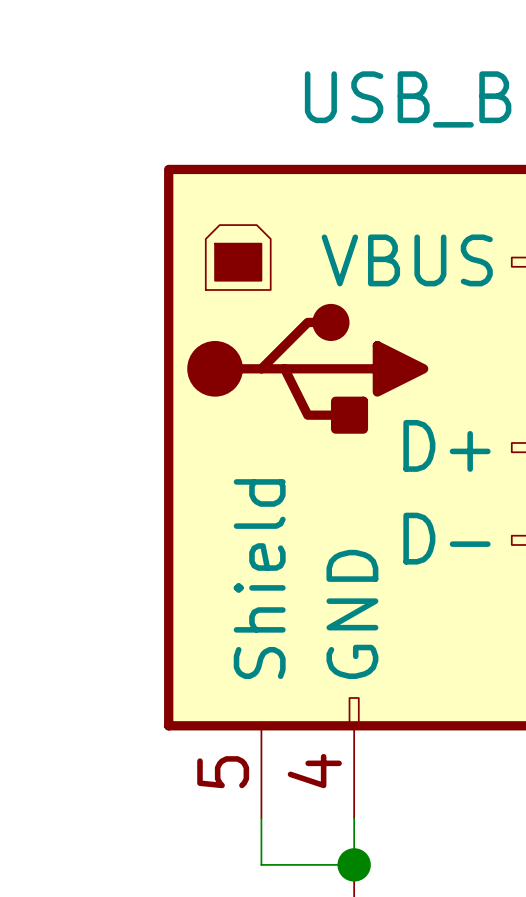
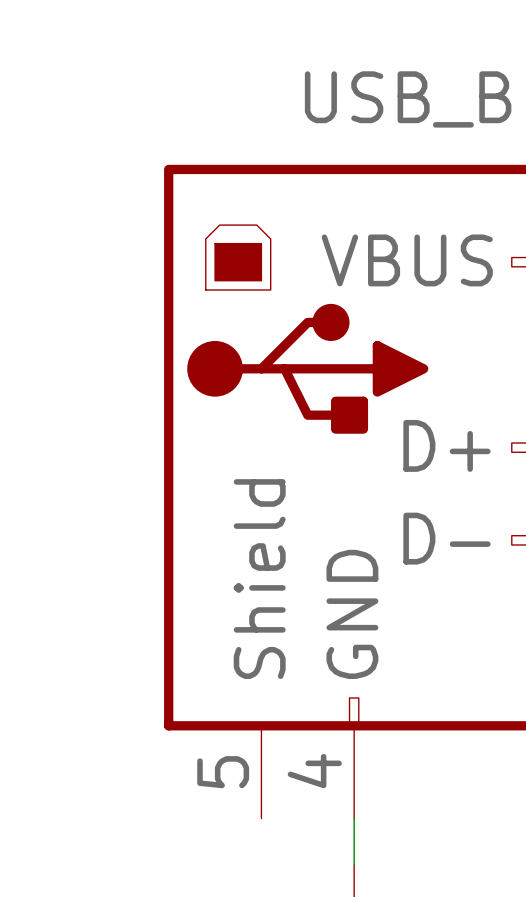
wire: (261, 818) (261, 864) (354, 864) -> none
junction: (354, 864) -> none

